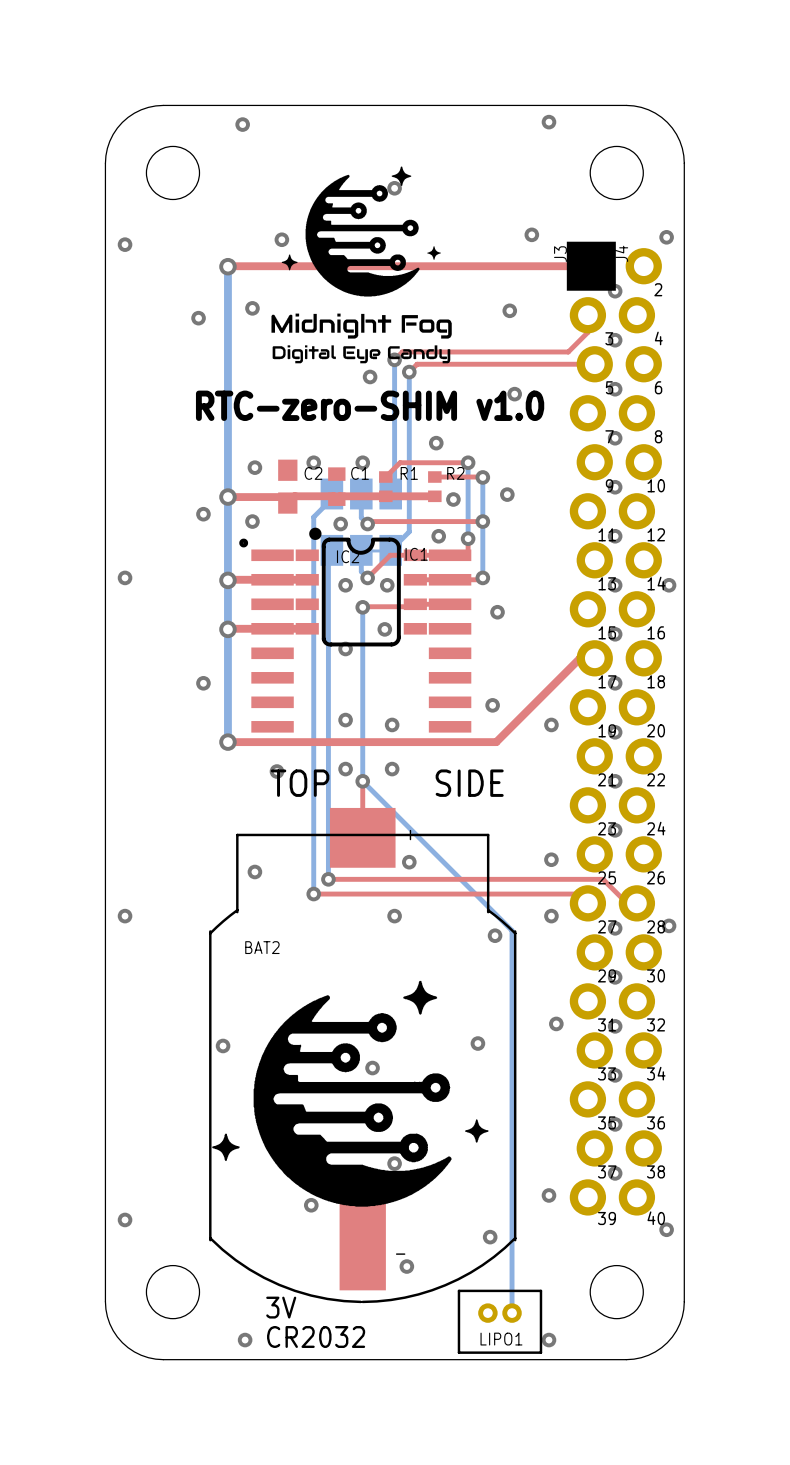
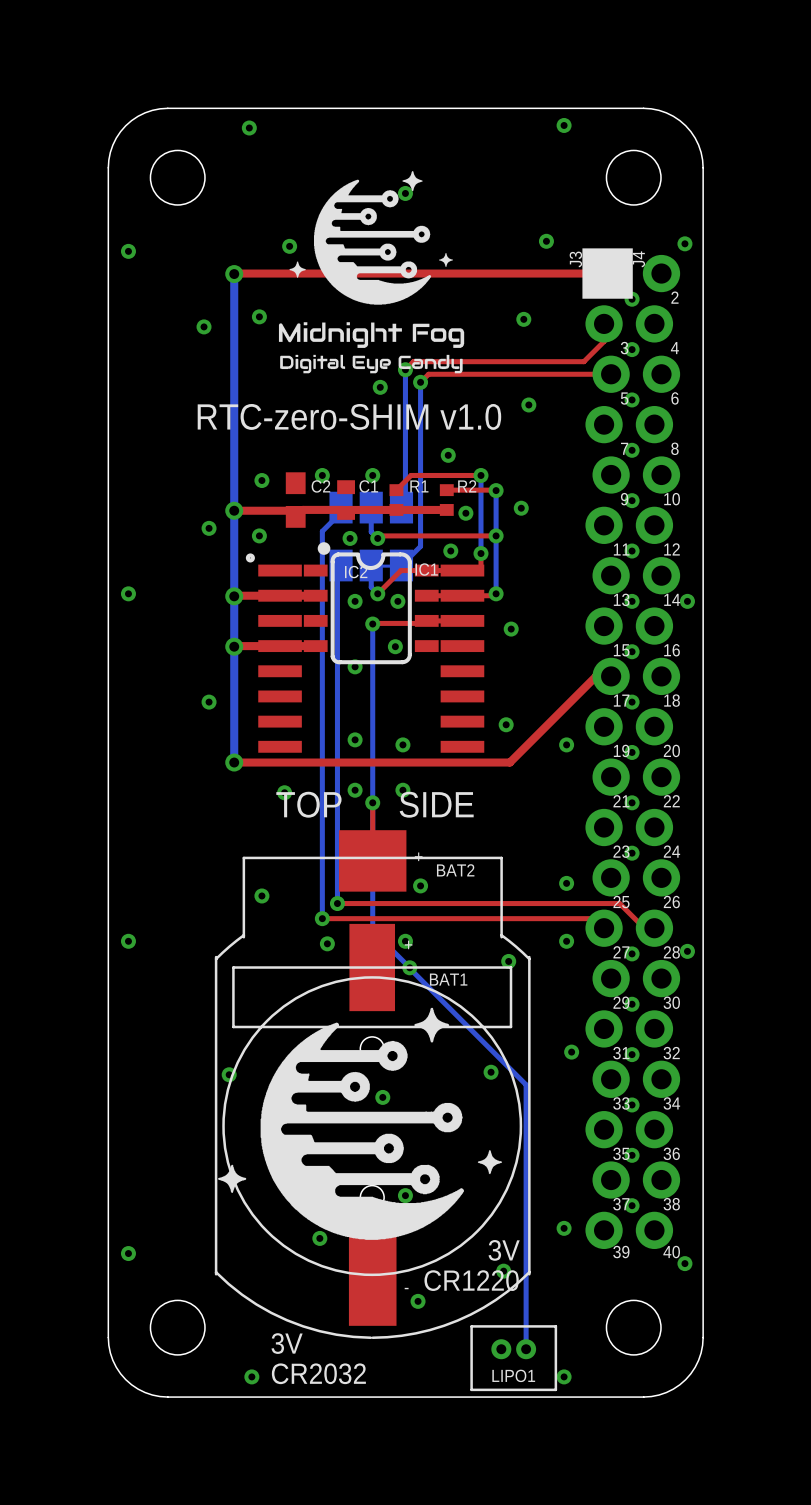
bottom track: (362, 781) (512, 930) (512, 1055) -> (372, 802) (372, 930) (526, 1084)
via: none -> (327, 943)
text: none -> + (408, 944)
via: none -> (409, 967)
BAT2 name position: BAT2 (262, 947) -> BAT2 (455, 870)
BAT1: none -> (372, 1124)
text: none -> 3V (504, 1250)
text: none -> CR1220 (471, 1280)

